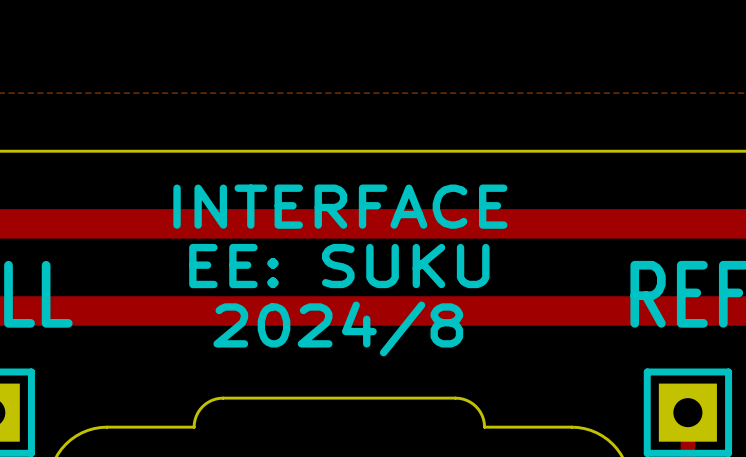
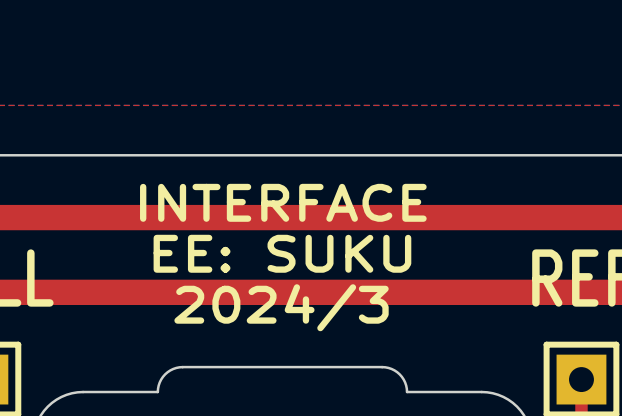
text: 2024/8 (338, 328) -> 2024/3 (281, 307)

